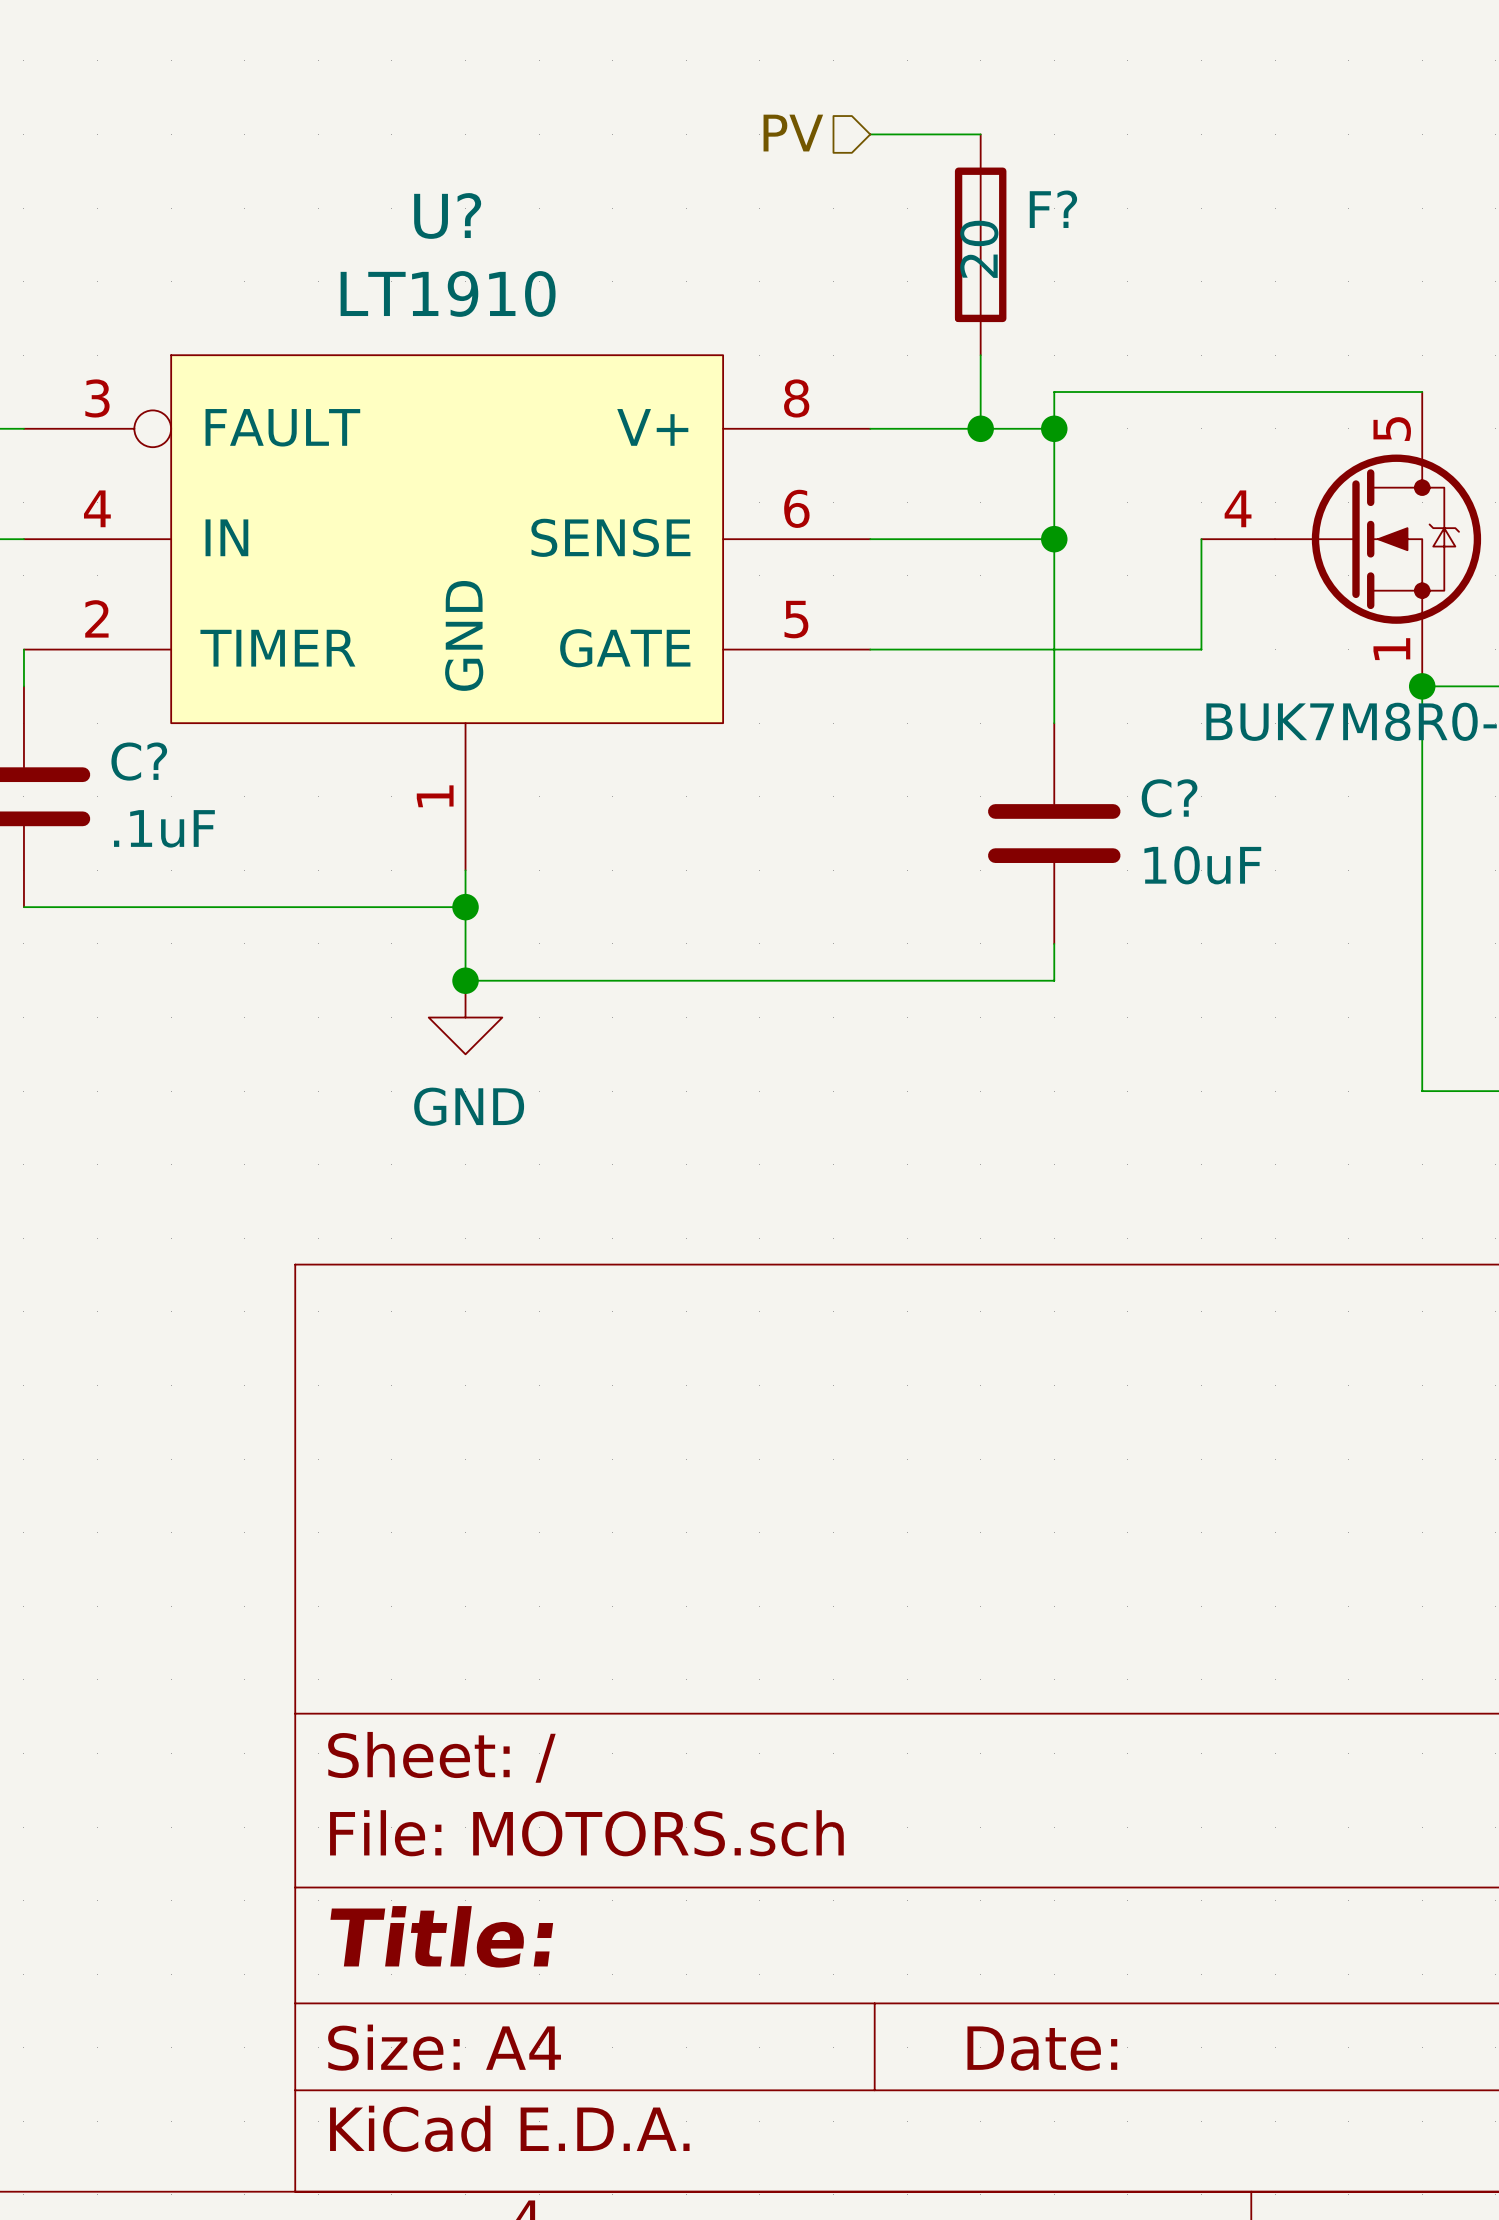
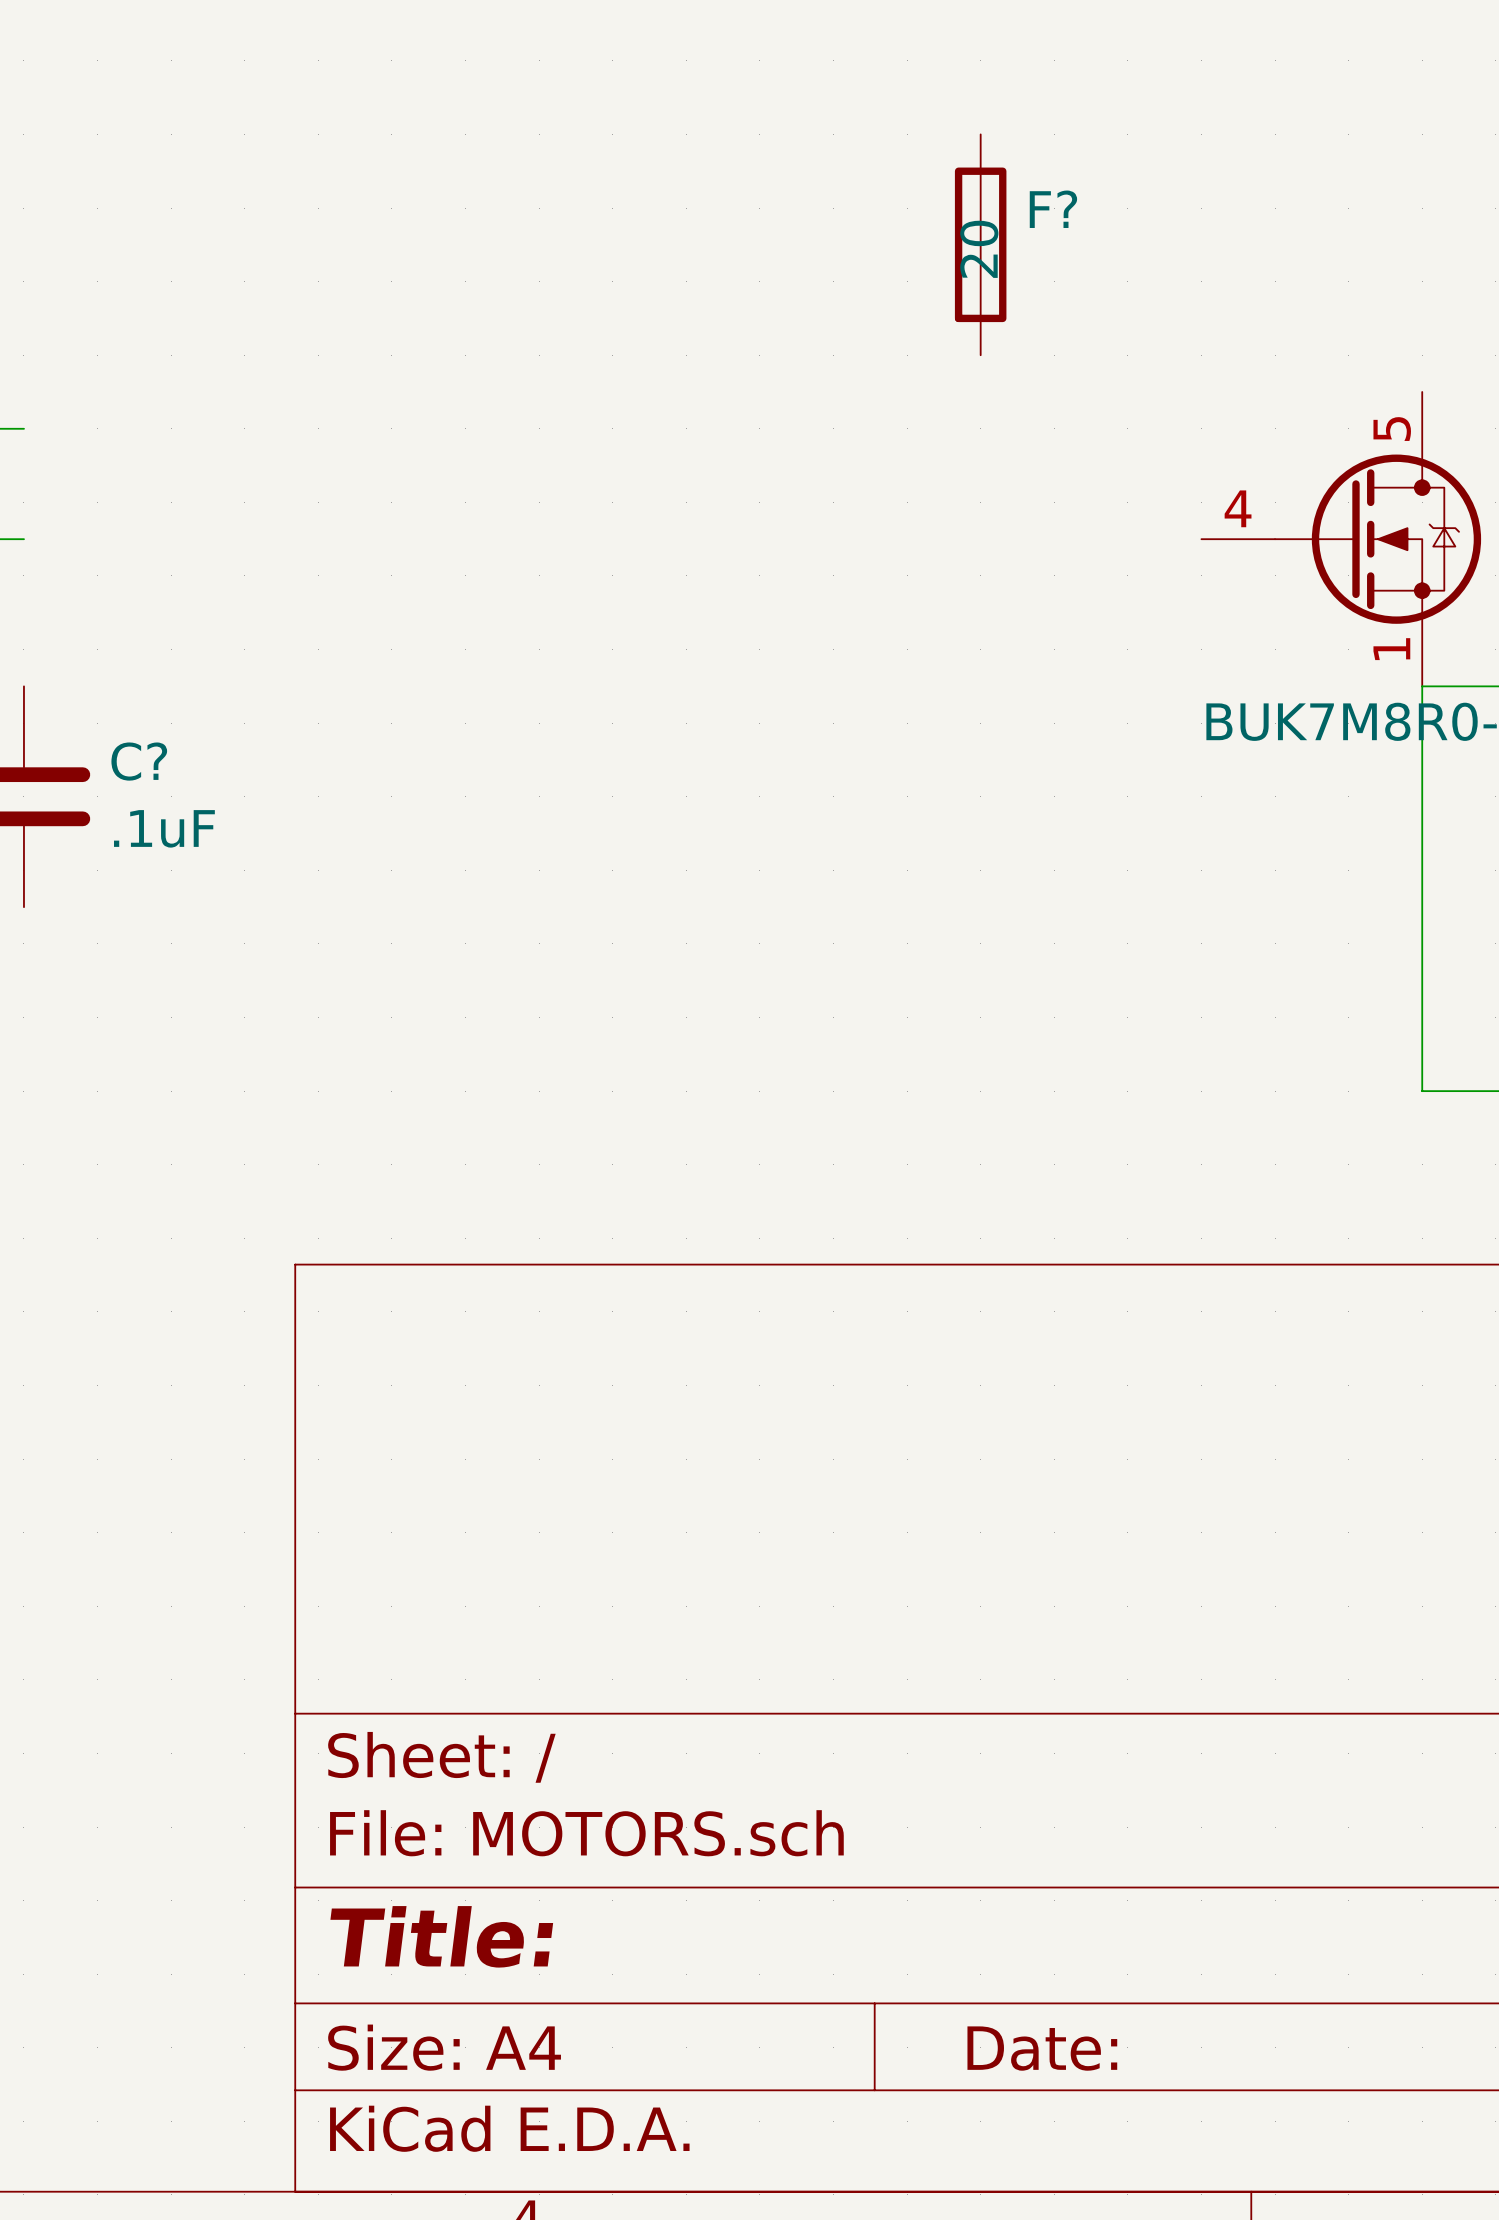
hierarchical label: PV (793, 133) -> none
wire: (870, 134) (980, 134) -> none
wire: (980, 355) (980, 428) -> none
wire: (1422, 392) (1054, 392) (1054, 723) -> none
wire: (870, 428) (1054, 428) -> none
junction: (980, 428) -> none
junction: (1054, 428) -> none
wire: (870, 539) (1054, 539) -> none
junction: (1054, 539) -> none
wire: (1201, 539) (1201, 649) (870, 649) -> none
U?: LT1910 (447, 612) -> none
wire: (23, 649) (23, 686) -> none
junction: (1422, 686) -> none
C?: 10uF (1054, 833) -> none
wire: (465, 870) (465, 980) (1054, 980) (1054, 943) -> none
wire: (23, 907) (465, 907) -> none
junction: (465, 907) -> none
junction: (465, 980) -> none
power symbol: GND (465, 1017) -> none

